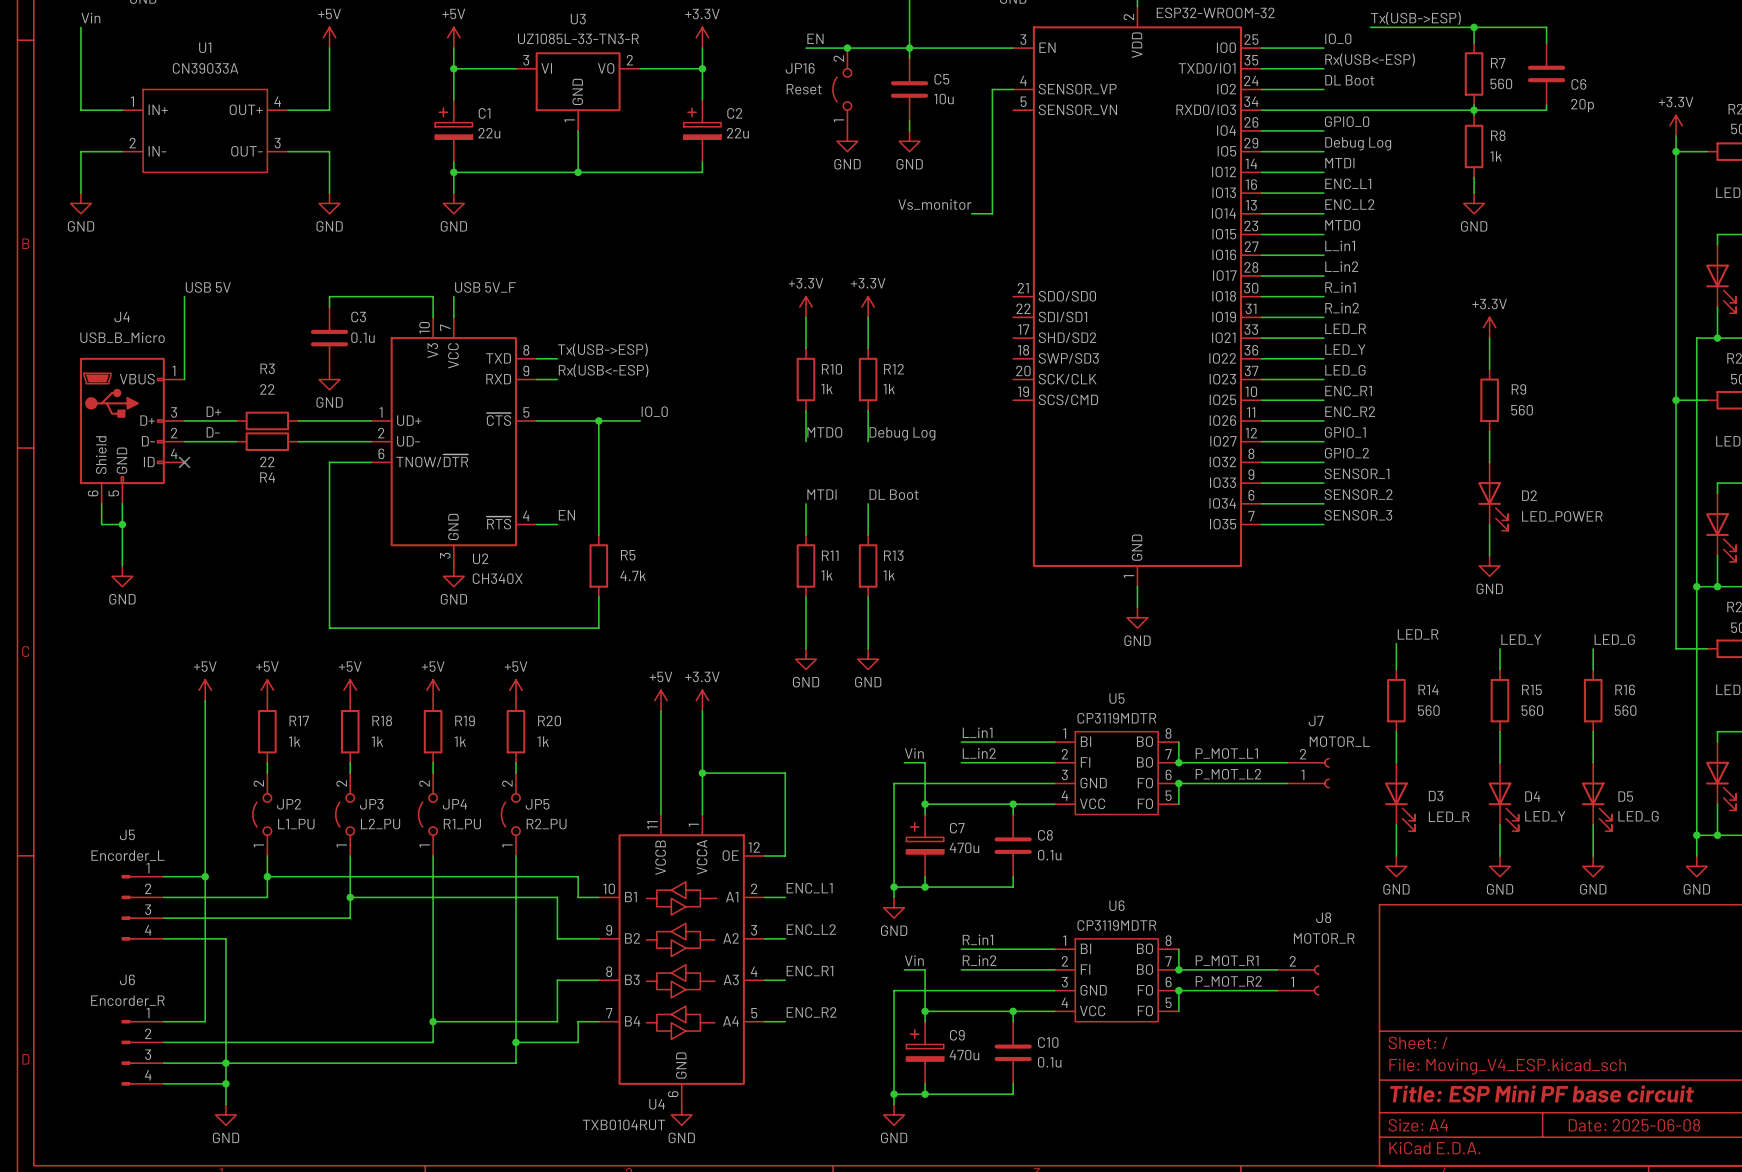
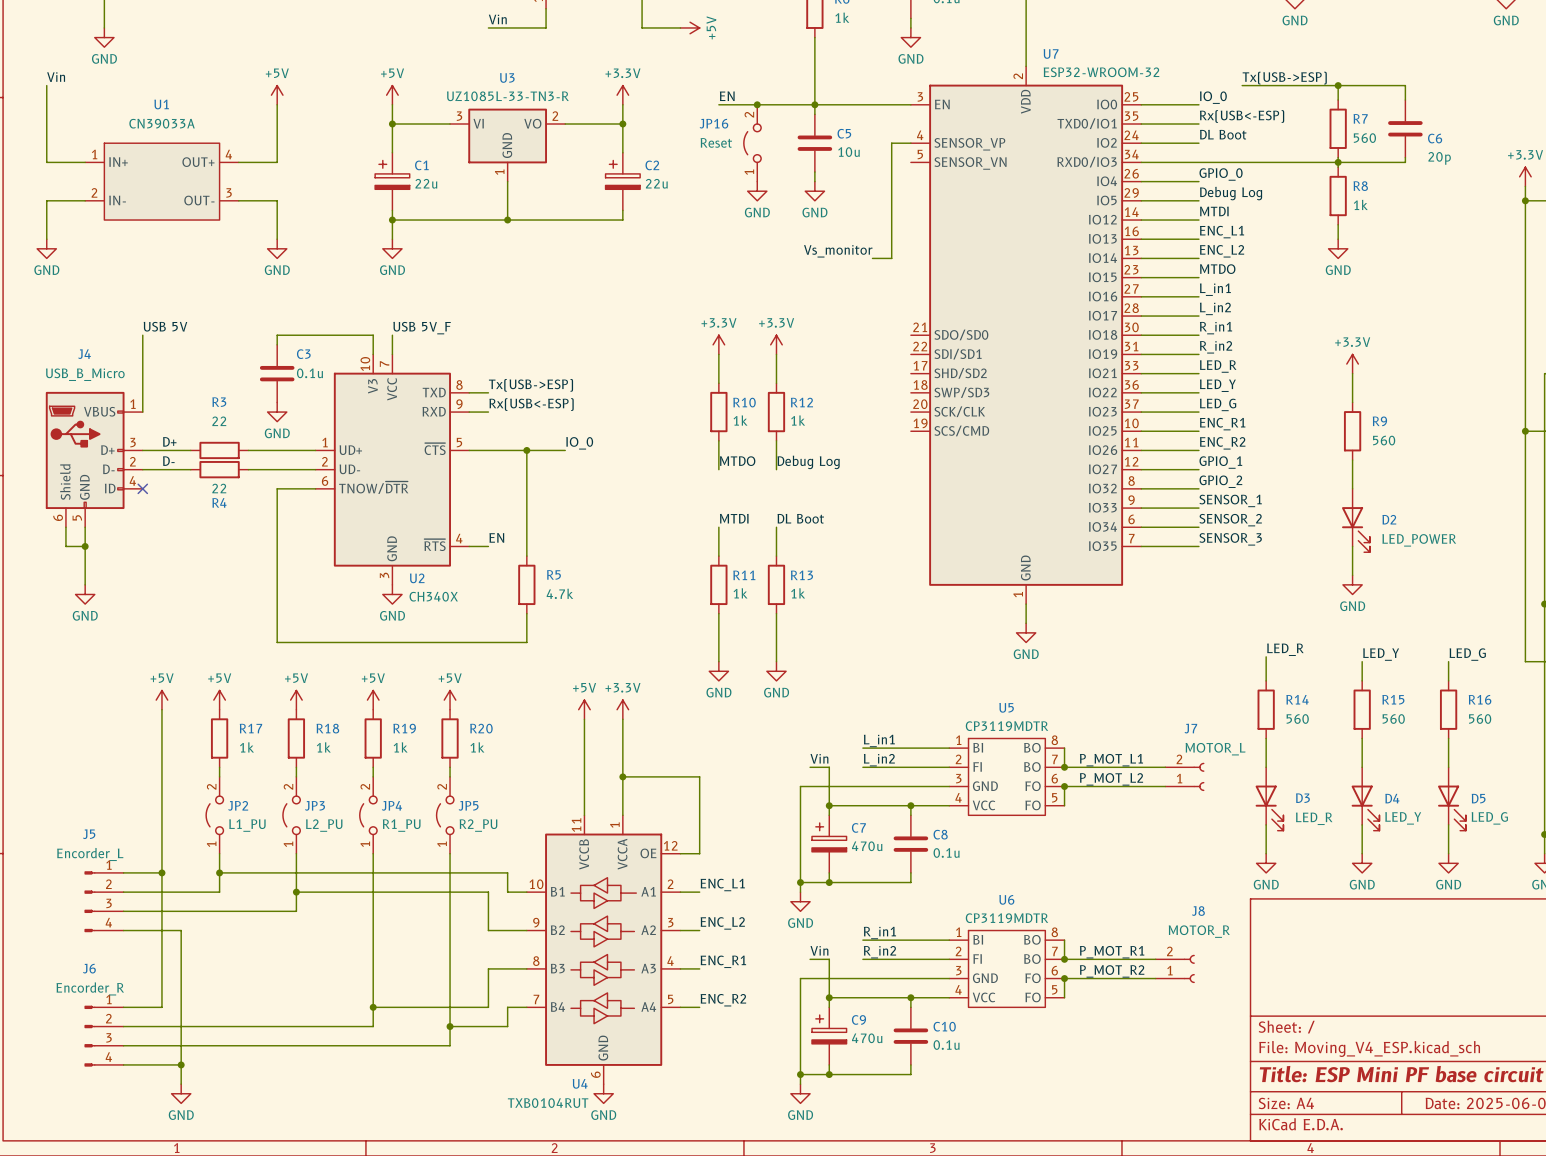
junction: (225, 1063) -> none

